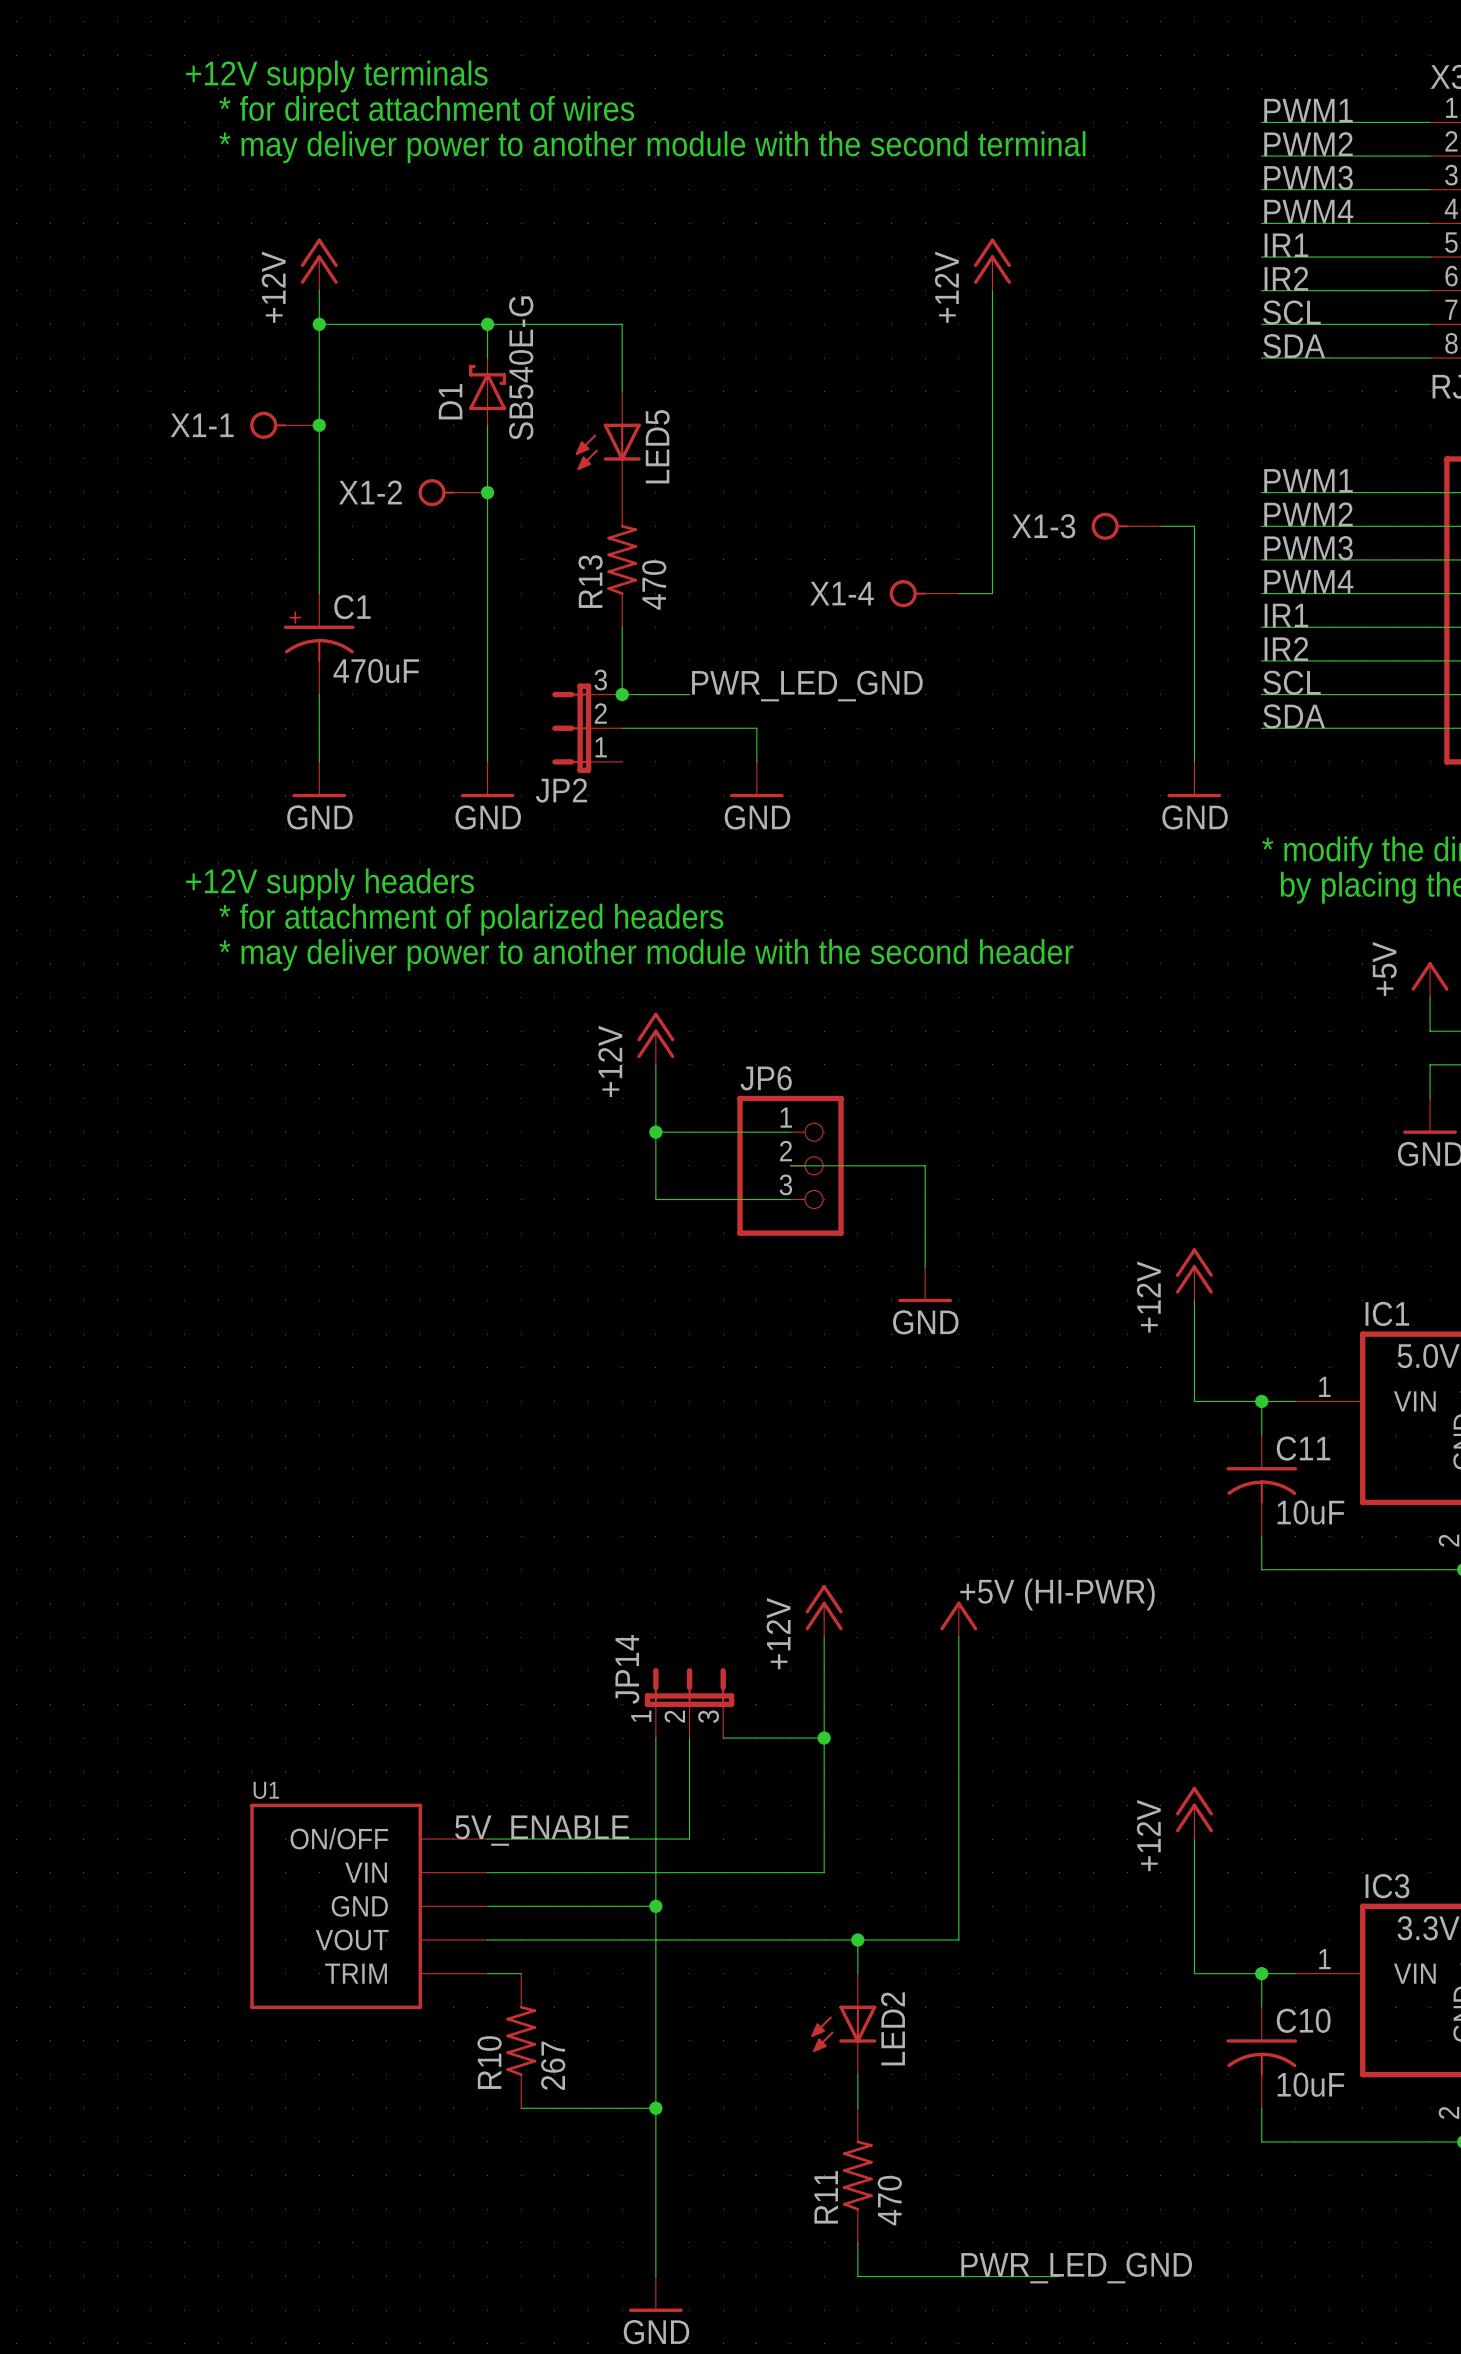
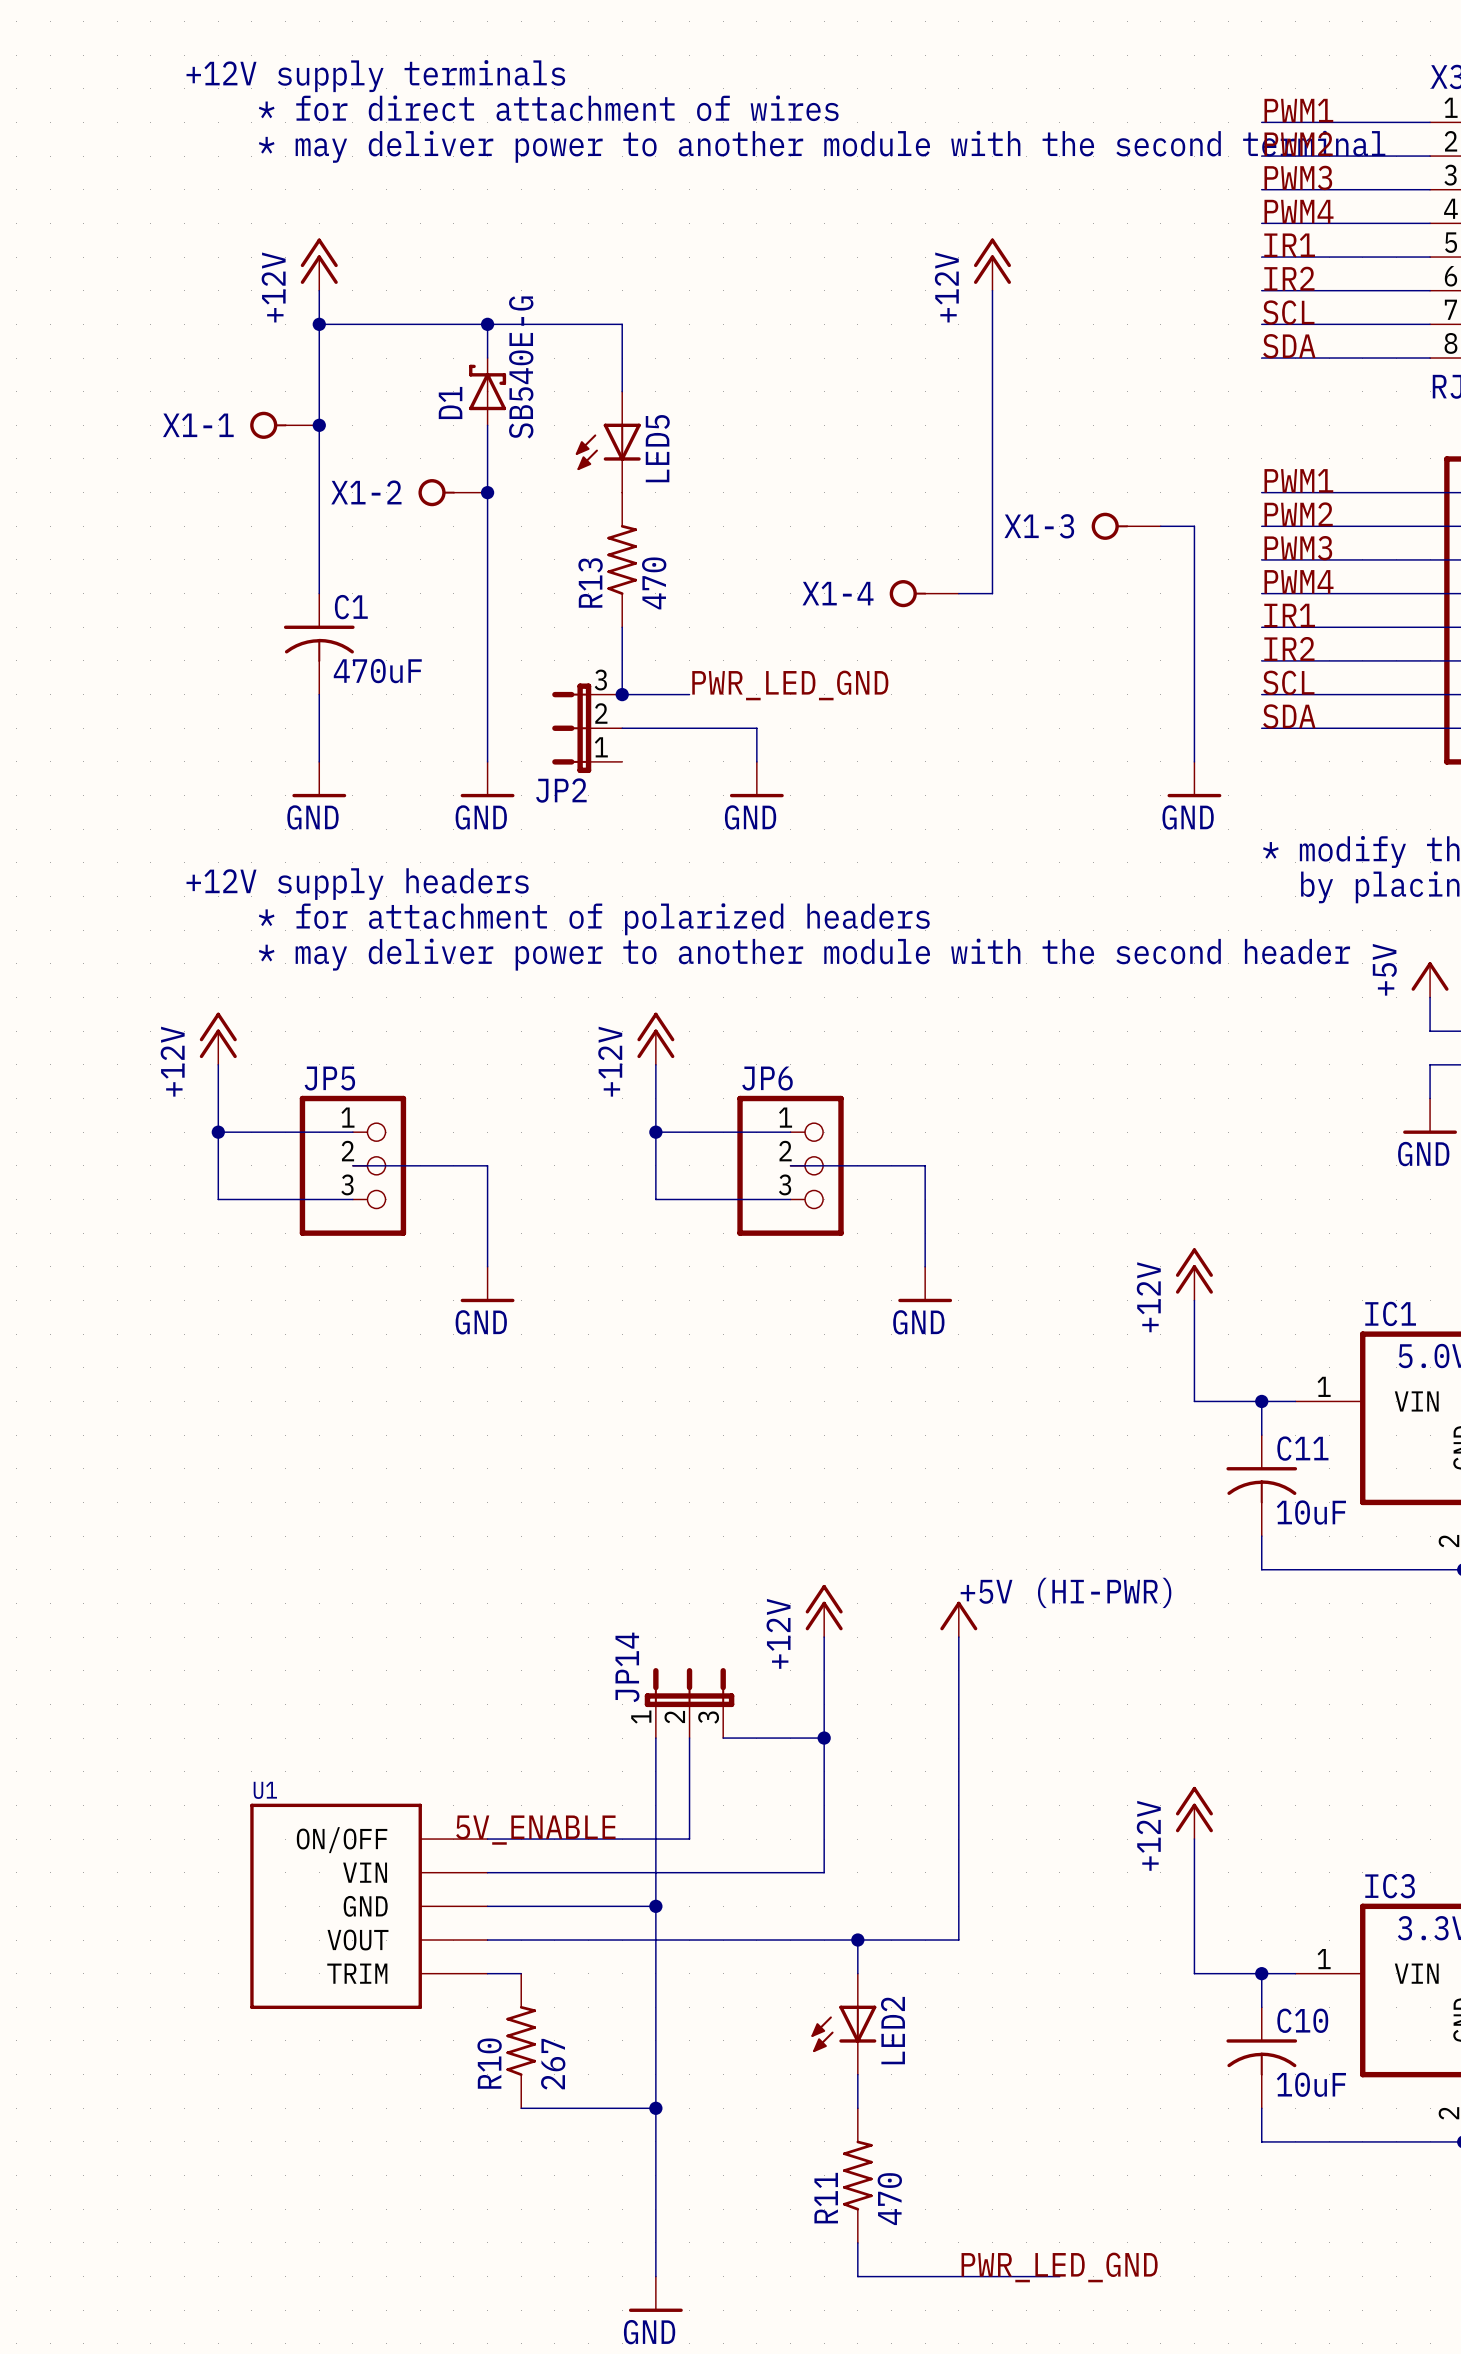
C1 symbol: [283, 593, 355, 695] -> [283, 593, 355, 695]
power symbol: none -> +12V (218, 1038)
wire: none -> (218, 1064) (218, 1199) (352, 1199)
wire: none -> (218, 1132) (352, 1132)
junction: none -> (218, 1132)
wire: none -> (352, 1165) (487, 1165) (487, 1266)
JP5: none -> (352, 1165)
power symbol: none -> GND (487, 1284)

